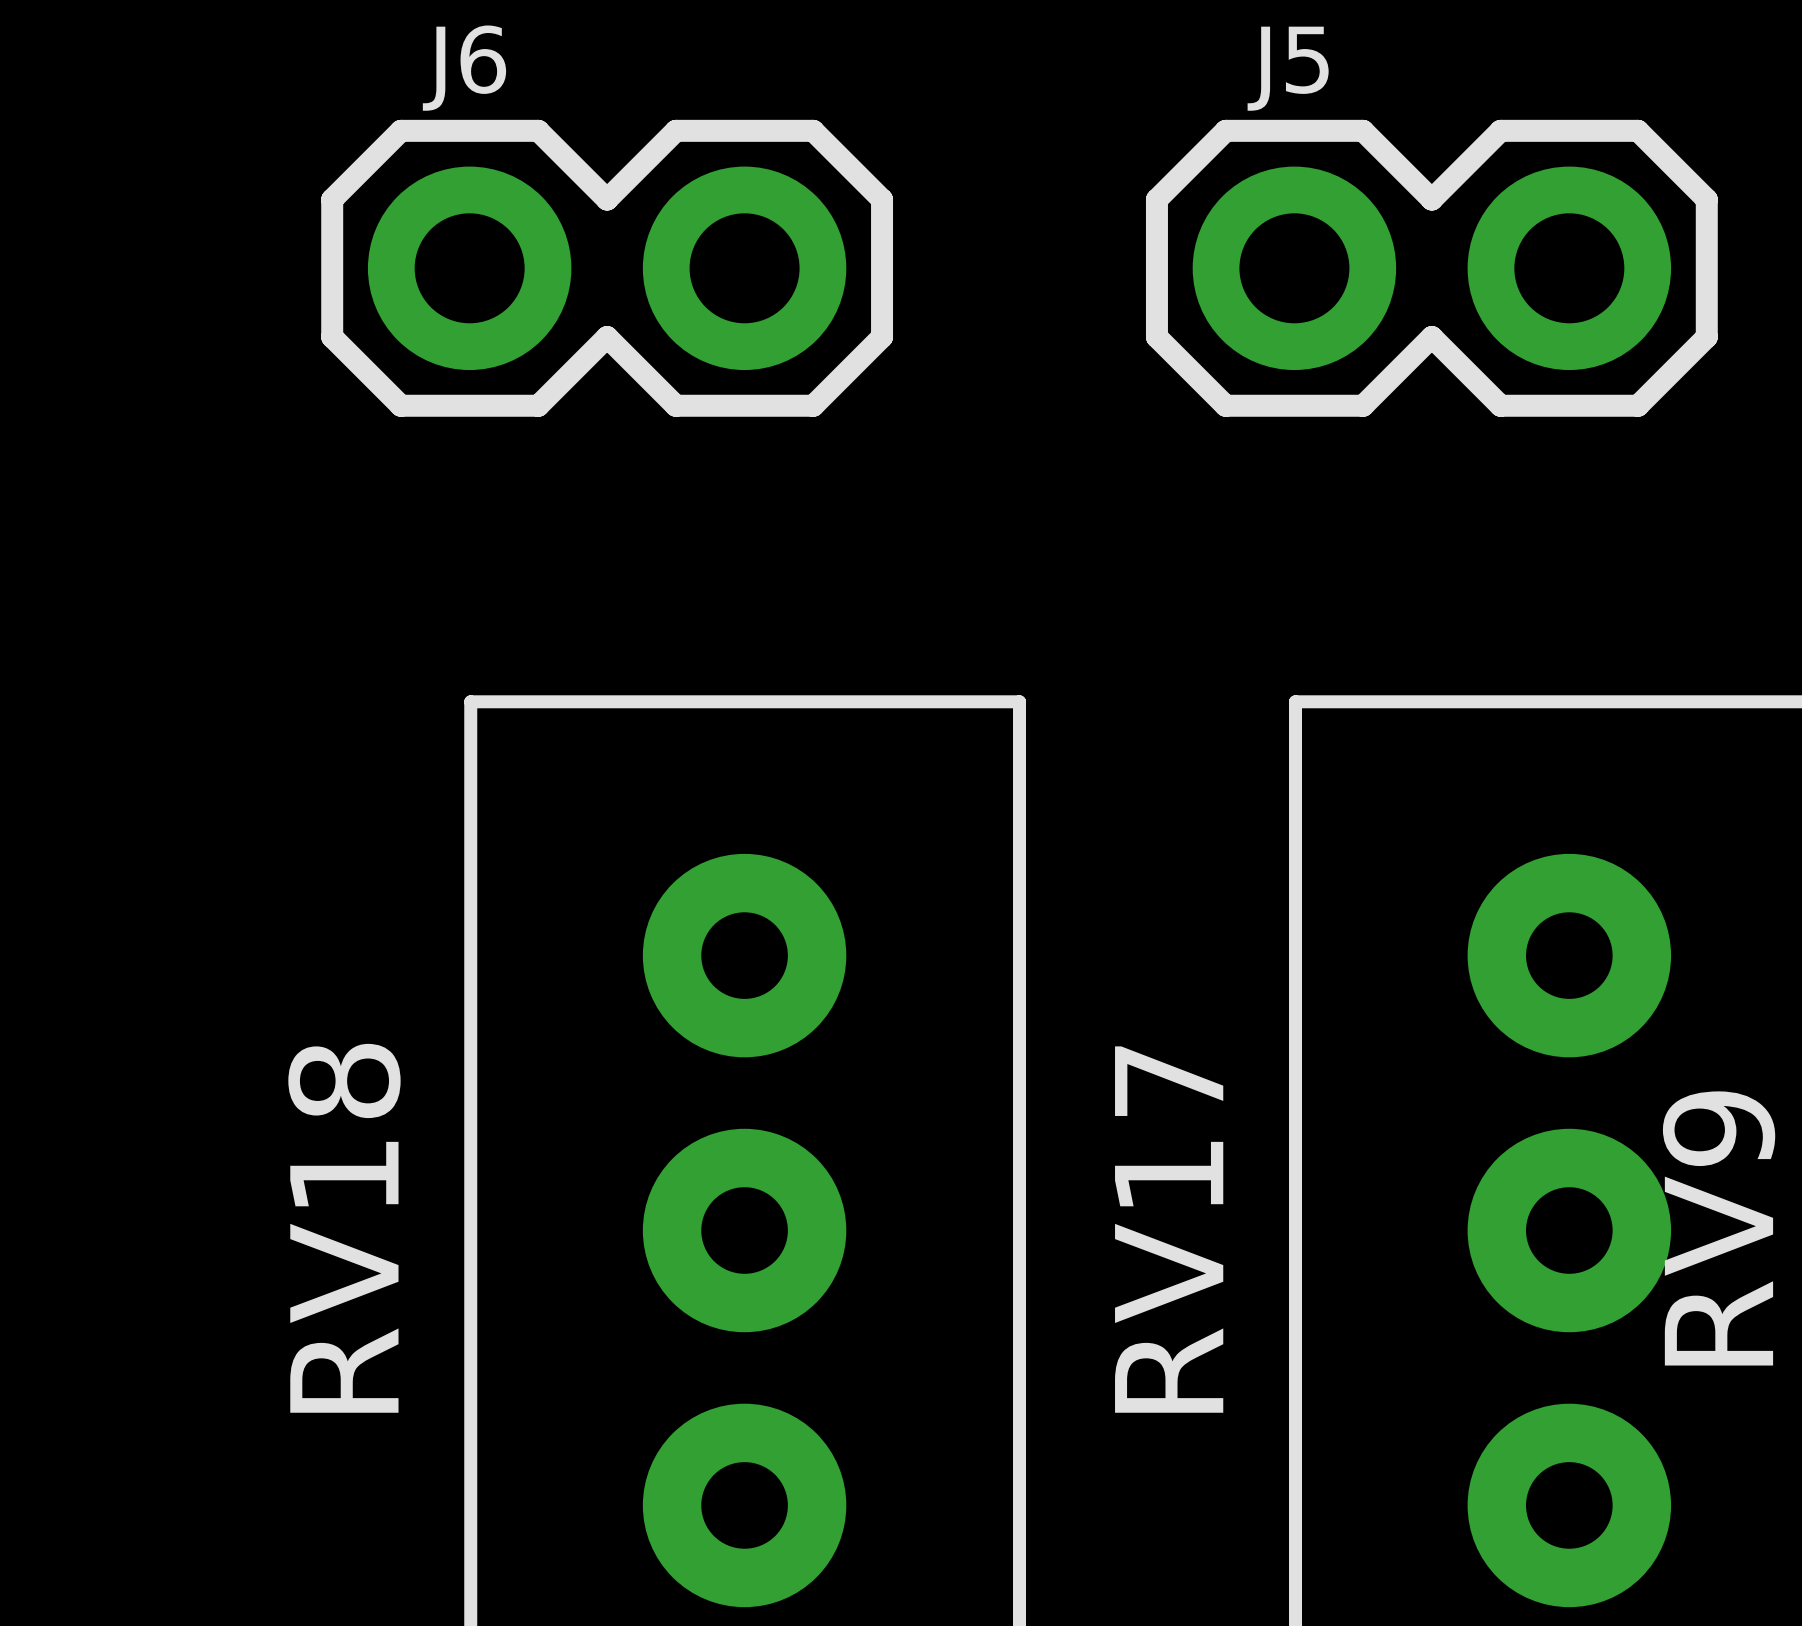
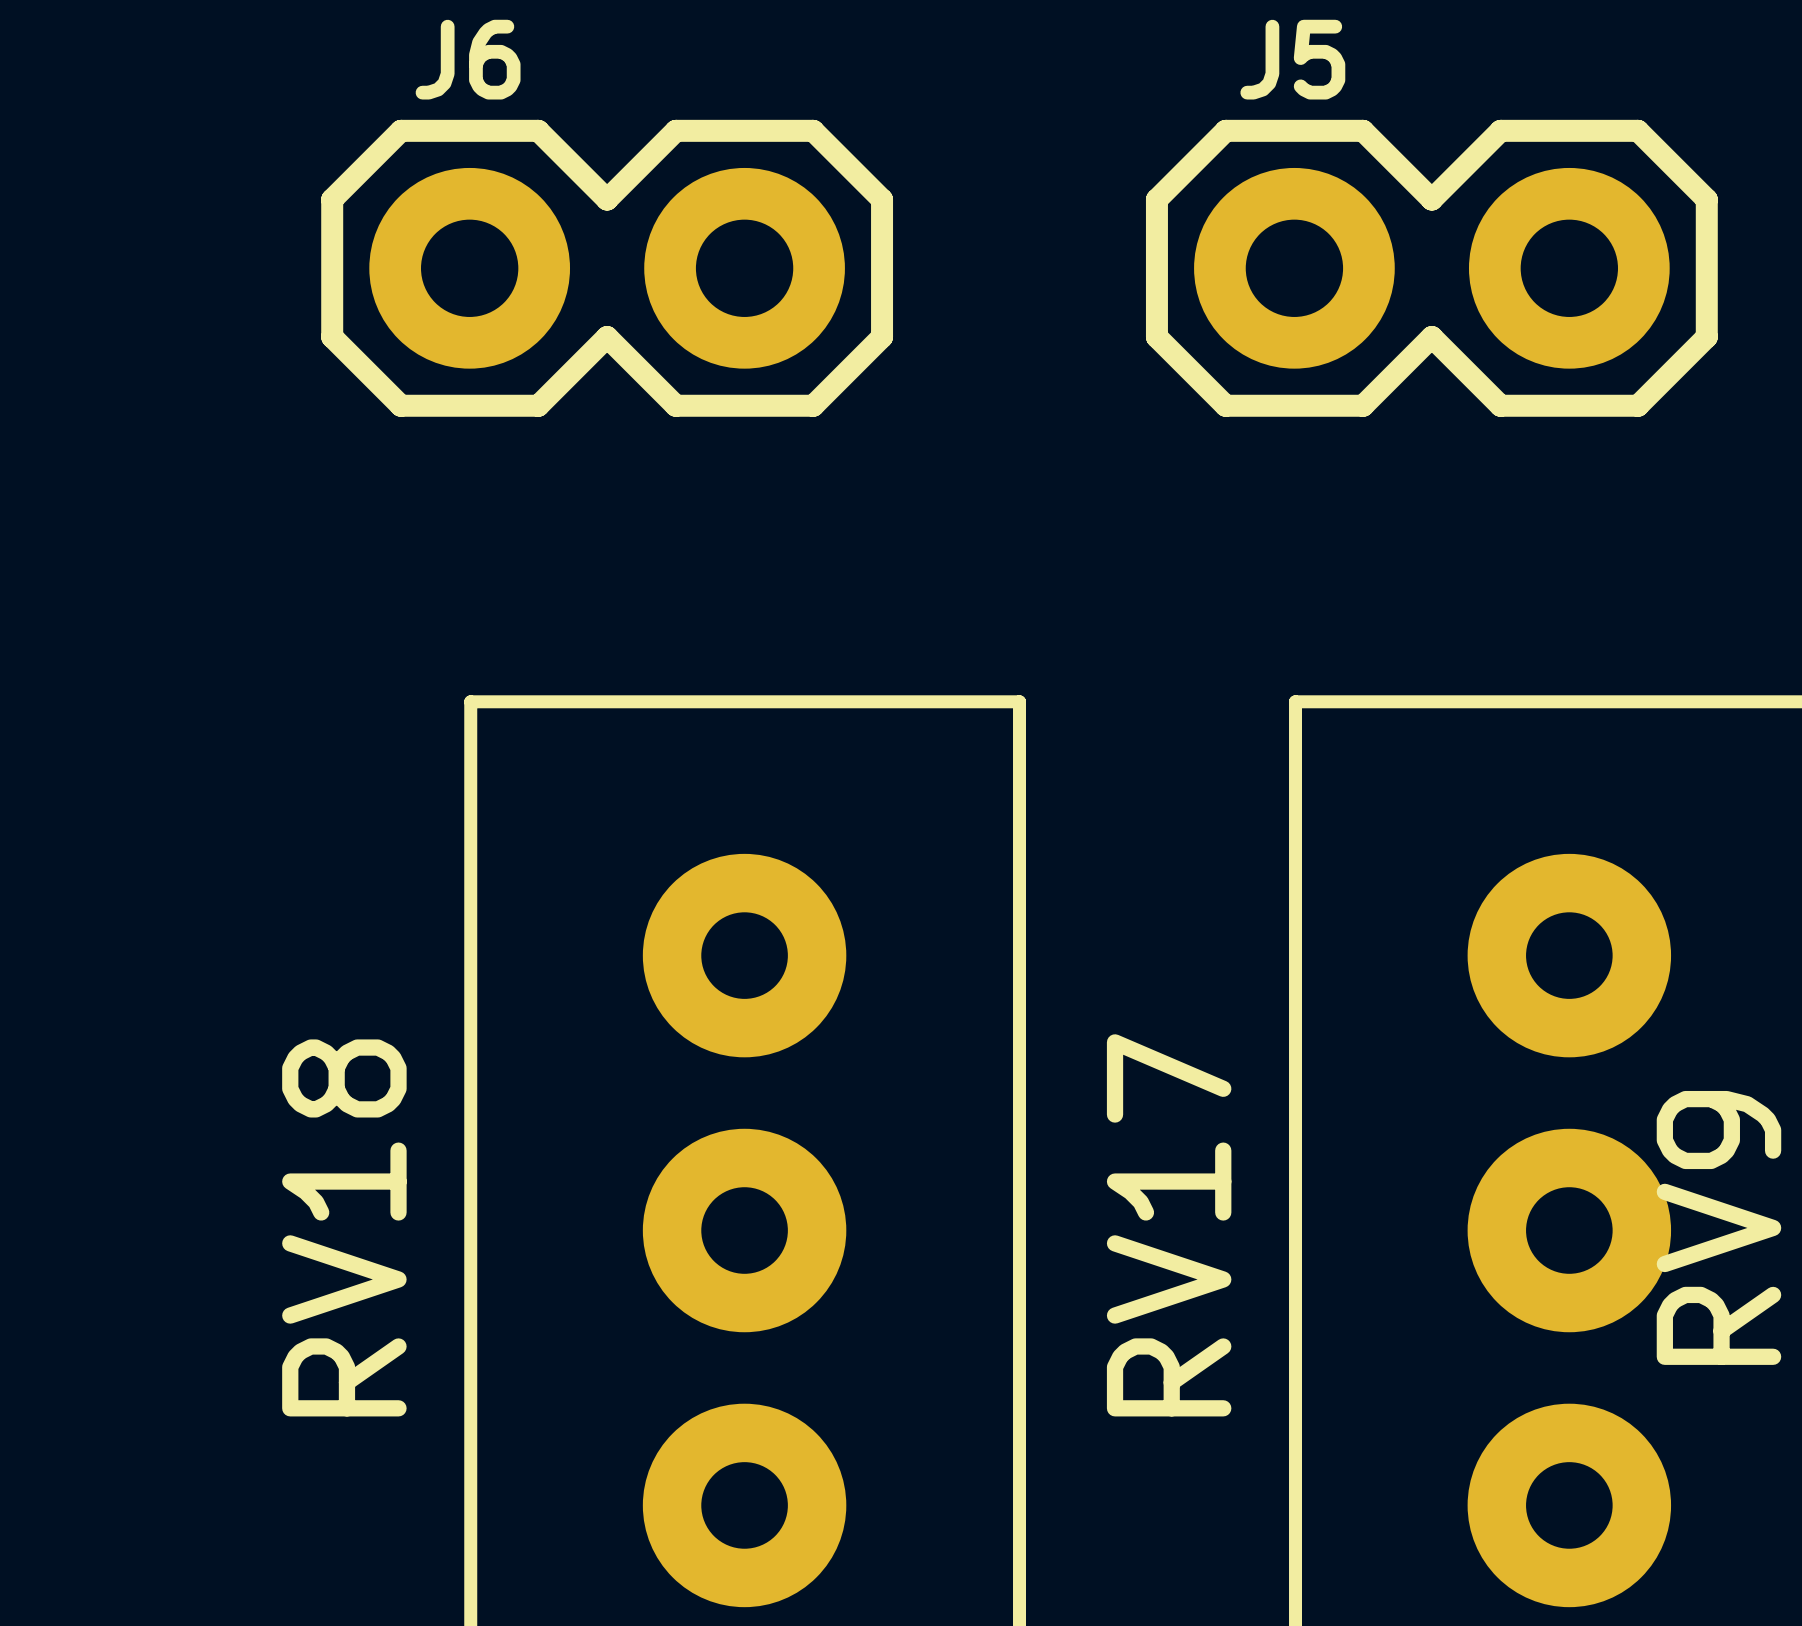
J6 footprint: [321, 119, 894, 417] -> [321, 119, 894, 417]
J5 footprint: [1145, 119, 1718, 417] -> [1145, 119, 1718, 417]

